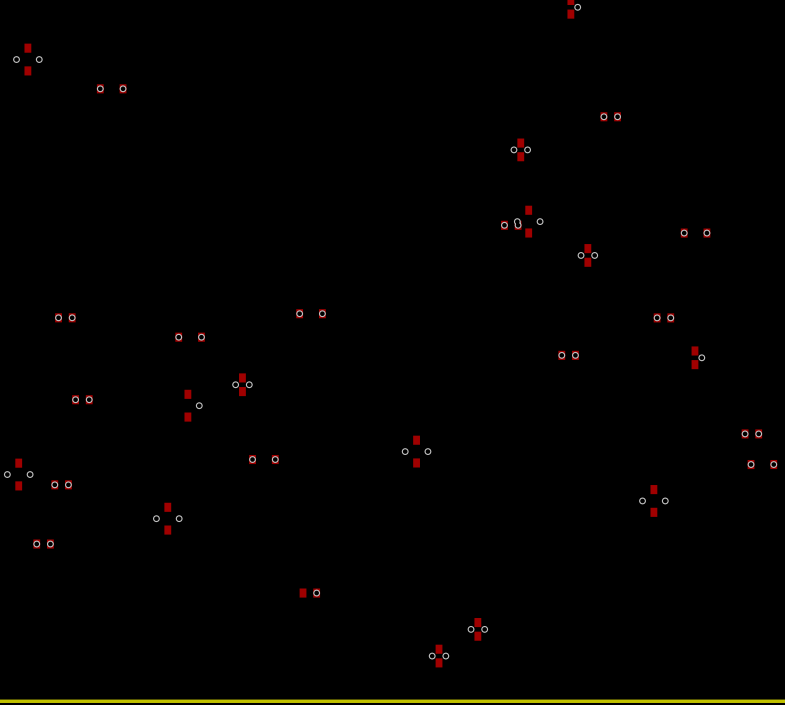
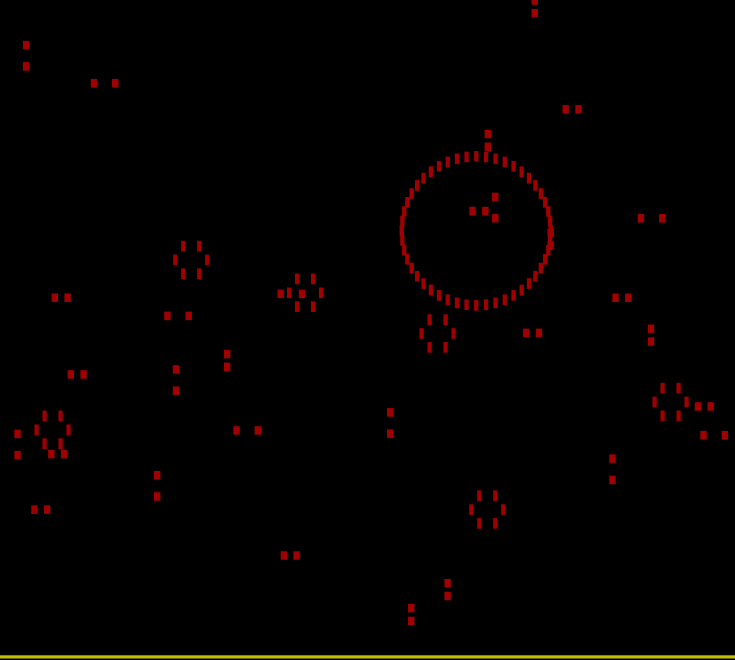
via: (577, 7) -> none
via: (16, 59) -> none
via: (39, 59) -> none
via: (100, 88) -> none
via: (123, 88) -> none
via: (603, 116) -> none
via: (617, 116) -> none
via: (513, 149) -> none
via: (527, 149) -> none
via: (517, 221) -> none
via: (540, 221) -> none
via: (504, 225) -> none
via: (518, 225) -> none
via: (684, 233) -> none
via: (706, 233) -> none
part: none -> (476, 230)
via: (581, 255) -> none
via: (594, 255) -> none
part: none -> (191, 259)
part: none -> (305, 292)
via: (299, 313) -> none
via: (322, 313) -> none
via: (58, 317) -> none
via: (72, 317) -> none
via: (657, 317) -> none
via: (670, 317) -> none
via: (178, 337) -> none
via: (201, 337) -> none
via: (561, 355) -> none
via: (575, 355) -> none
part: none -> (437, 333)
via: (701, 357) -> none
via: (235, 384) -> none
via: (249, 384) -> none
via: (75, 399) -> none
via: (89, 399) -> none
via: (199, 405) -> none
part: none -> (670, 402)
via: (745, 433) -> none
via: (758, 433) -> none
via: (405, 451) -> none
via: (427, 451) -> none
part: none -> (52, 429)
via: (252, 459) -> none
via: (275, 459) -> none
via: (751, 464) -> none
via: (773, 464) -> none
via: (7, 474) -> none
via: (30, 474) -> none
via: (54, 484) -> none
via: (68, 484) -> none
via: (642, 500) -> none
via: (665, 500) -> none
via: (156, 518) -> none
via: (179, 518) -> none
part: none -> (487, 509)
via: (36, 544) -> none
via: (50, 544) -> none
via: (316, 593) -> none
via: (471, 629) -> none
via: (484, 629) -> none
via: (432, 656) -> none
via: (445, 656) -> none

